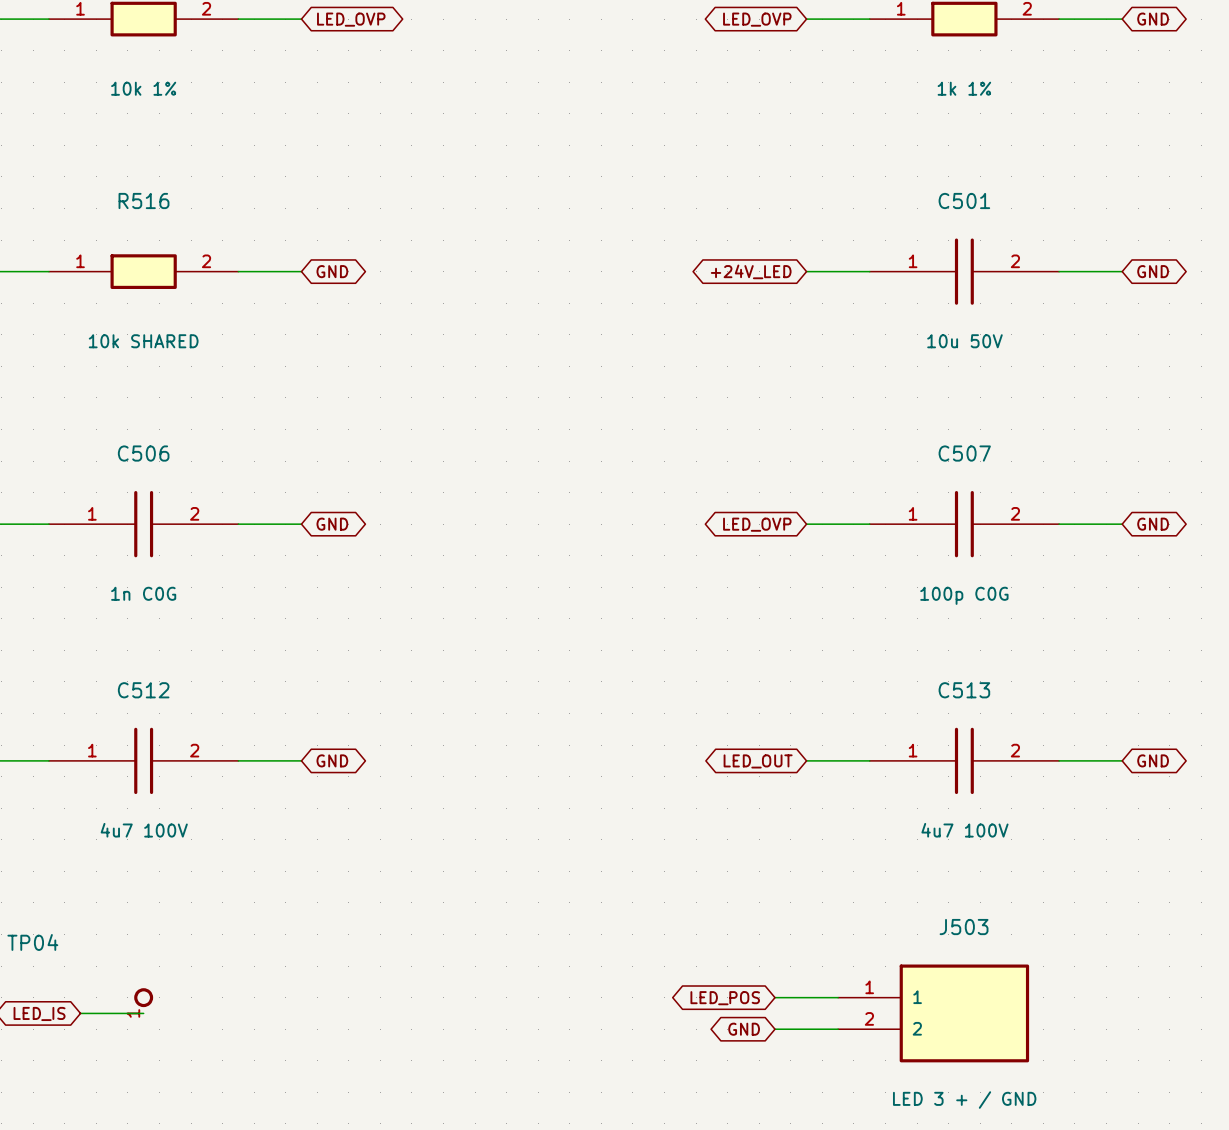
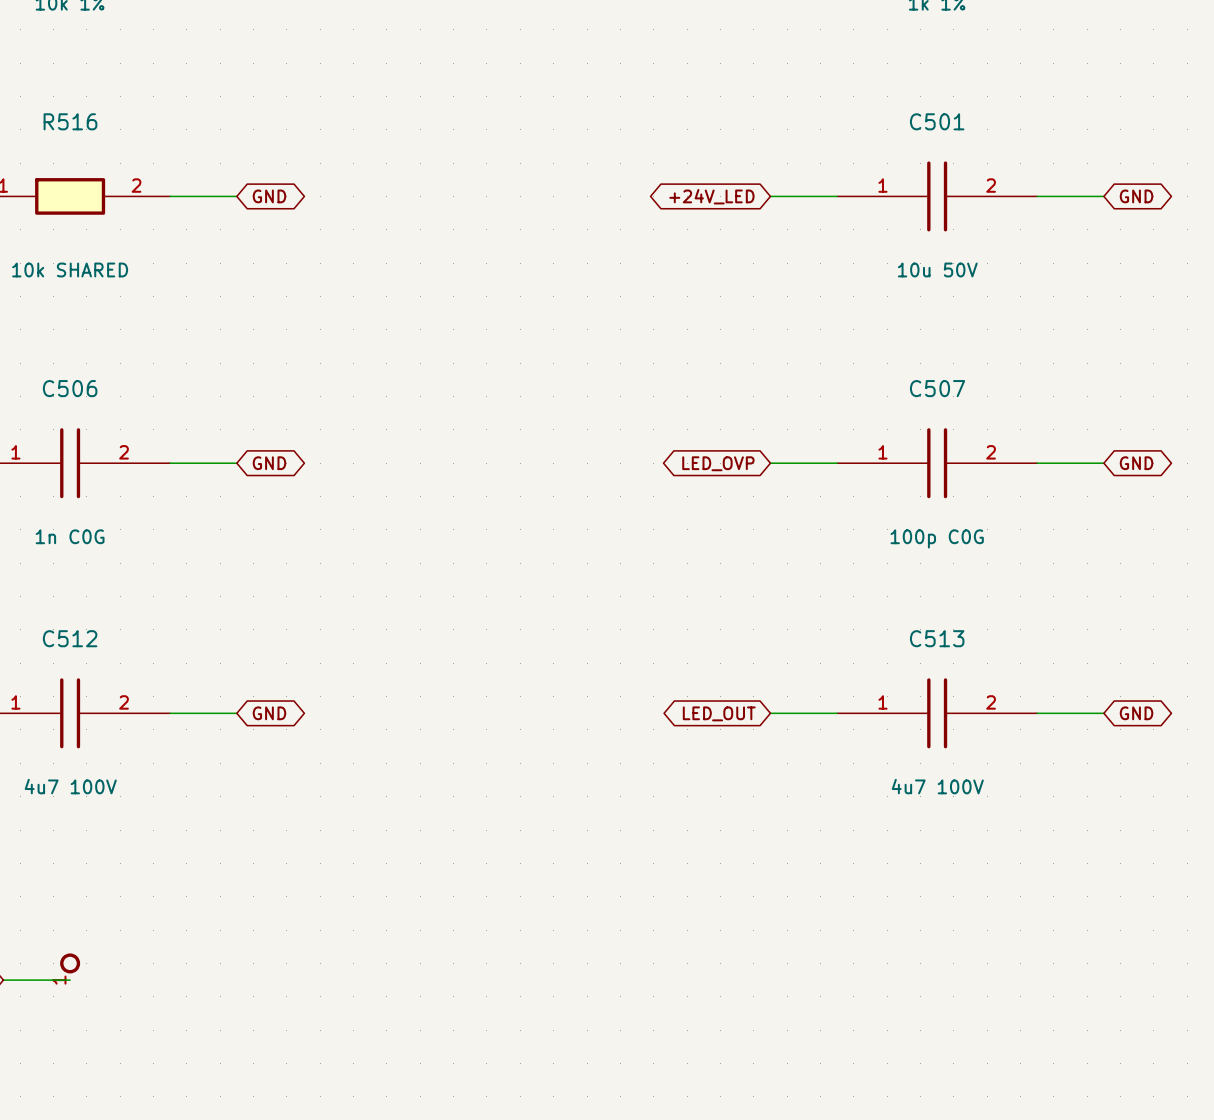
wire: (774, 997) (838, 997) -> none
global label: LED_POS (725, 998) -> none
J503: LED 3 + / GND (933, 1013) -> none
global label: GND (744, 1029) -> none
wire: (774, 1029) (838, 1029) -> none

